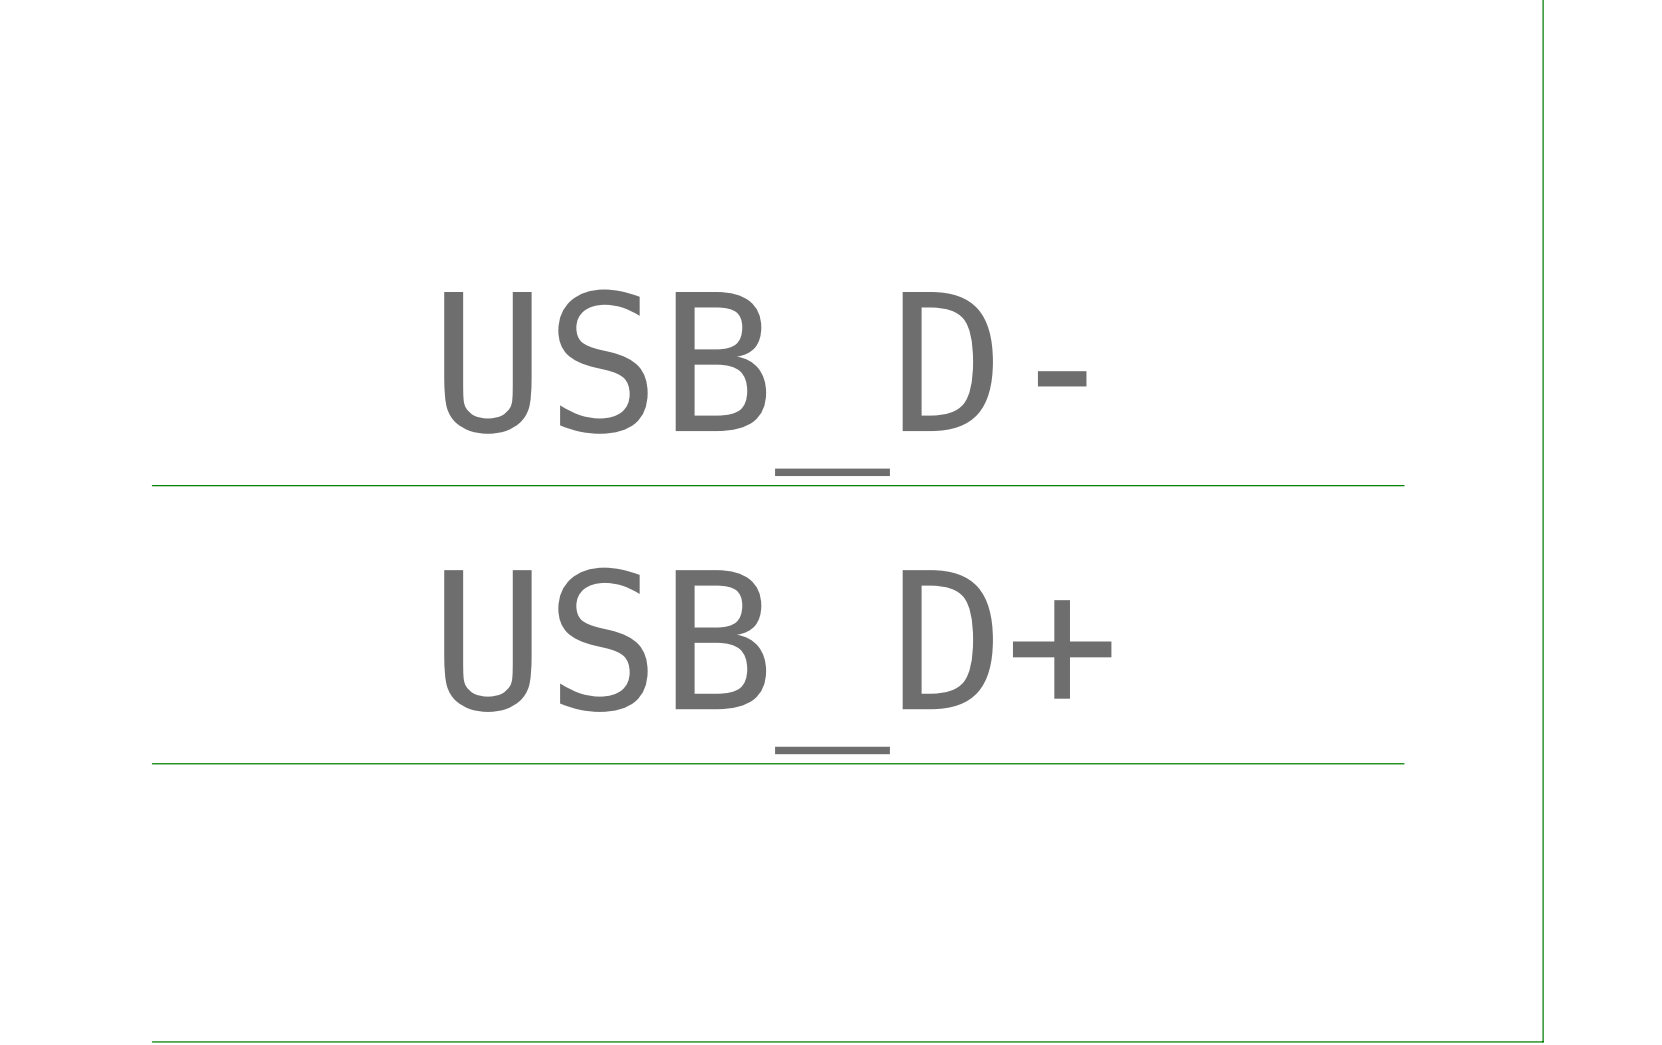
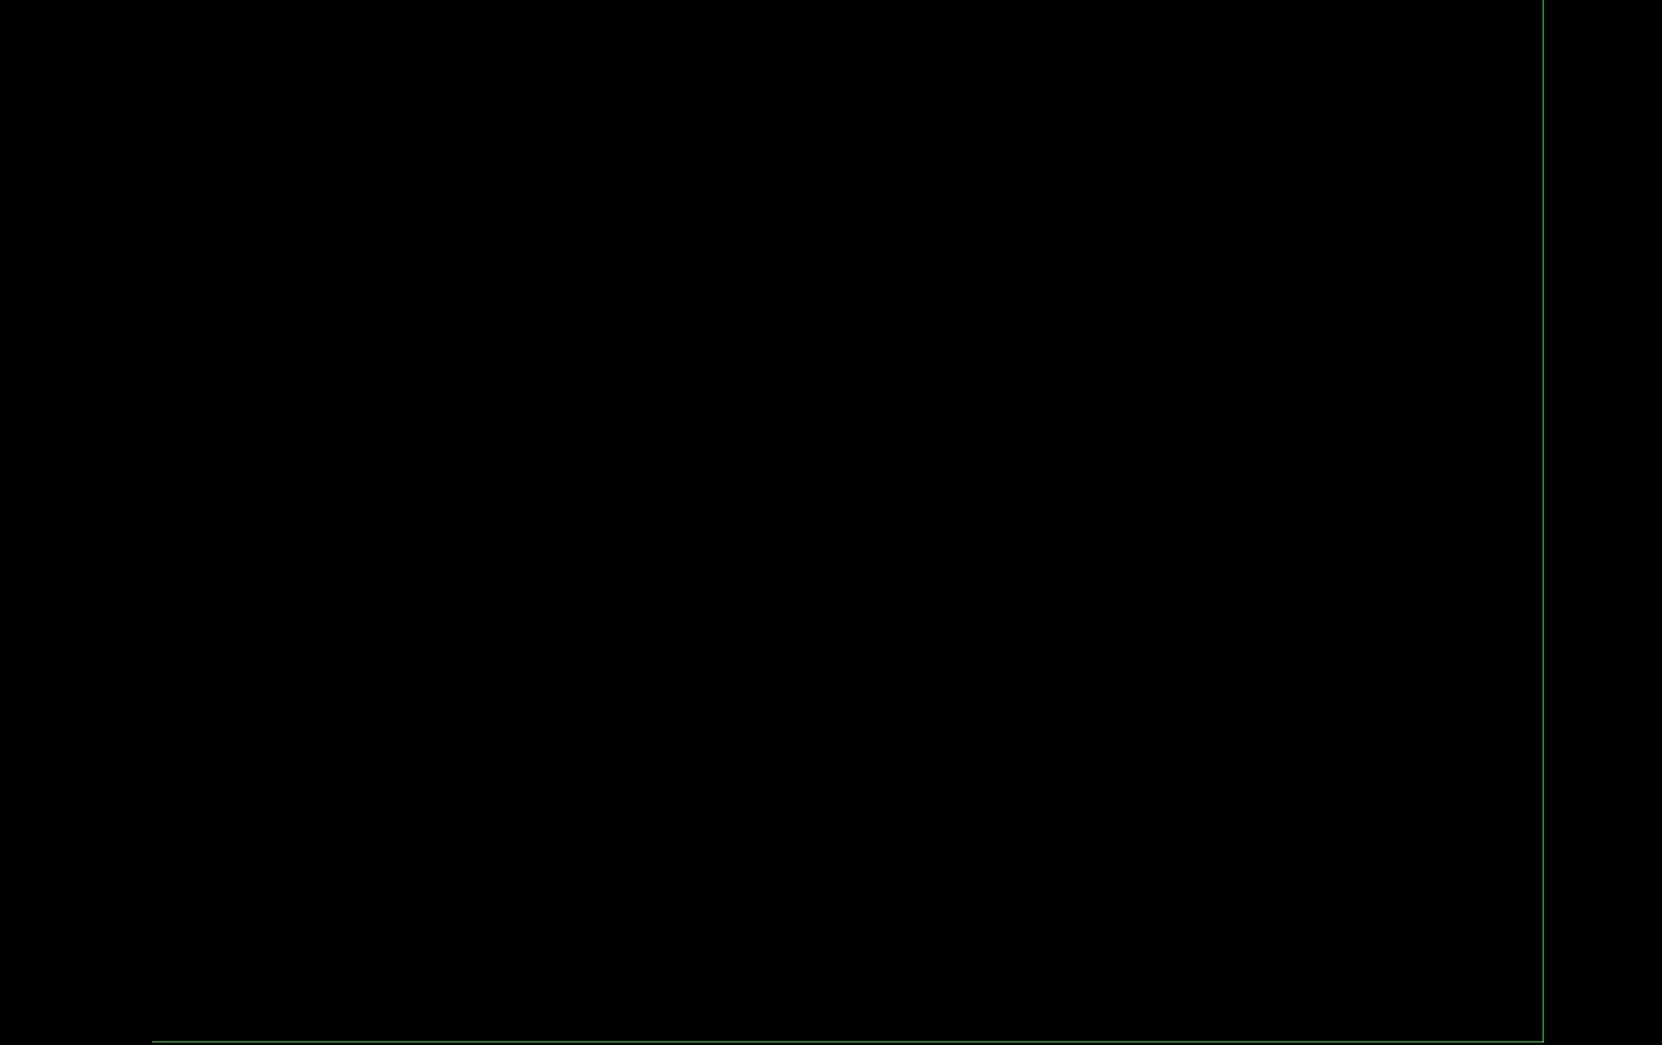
label: USB_D- (765, 382) -> none
wire: (152, 485) (1404, 485) -> none
label: USB_D+ (777, 660) -> none
wire: (152, 763) (1404, 763) -> none

